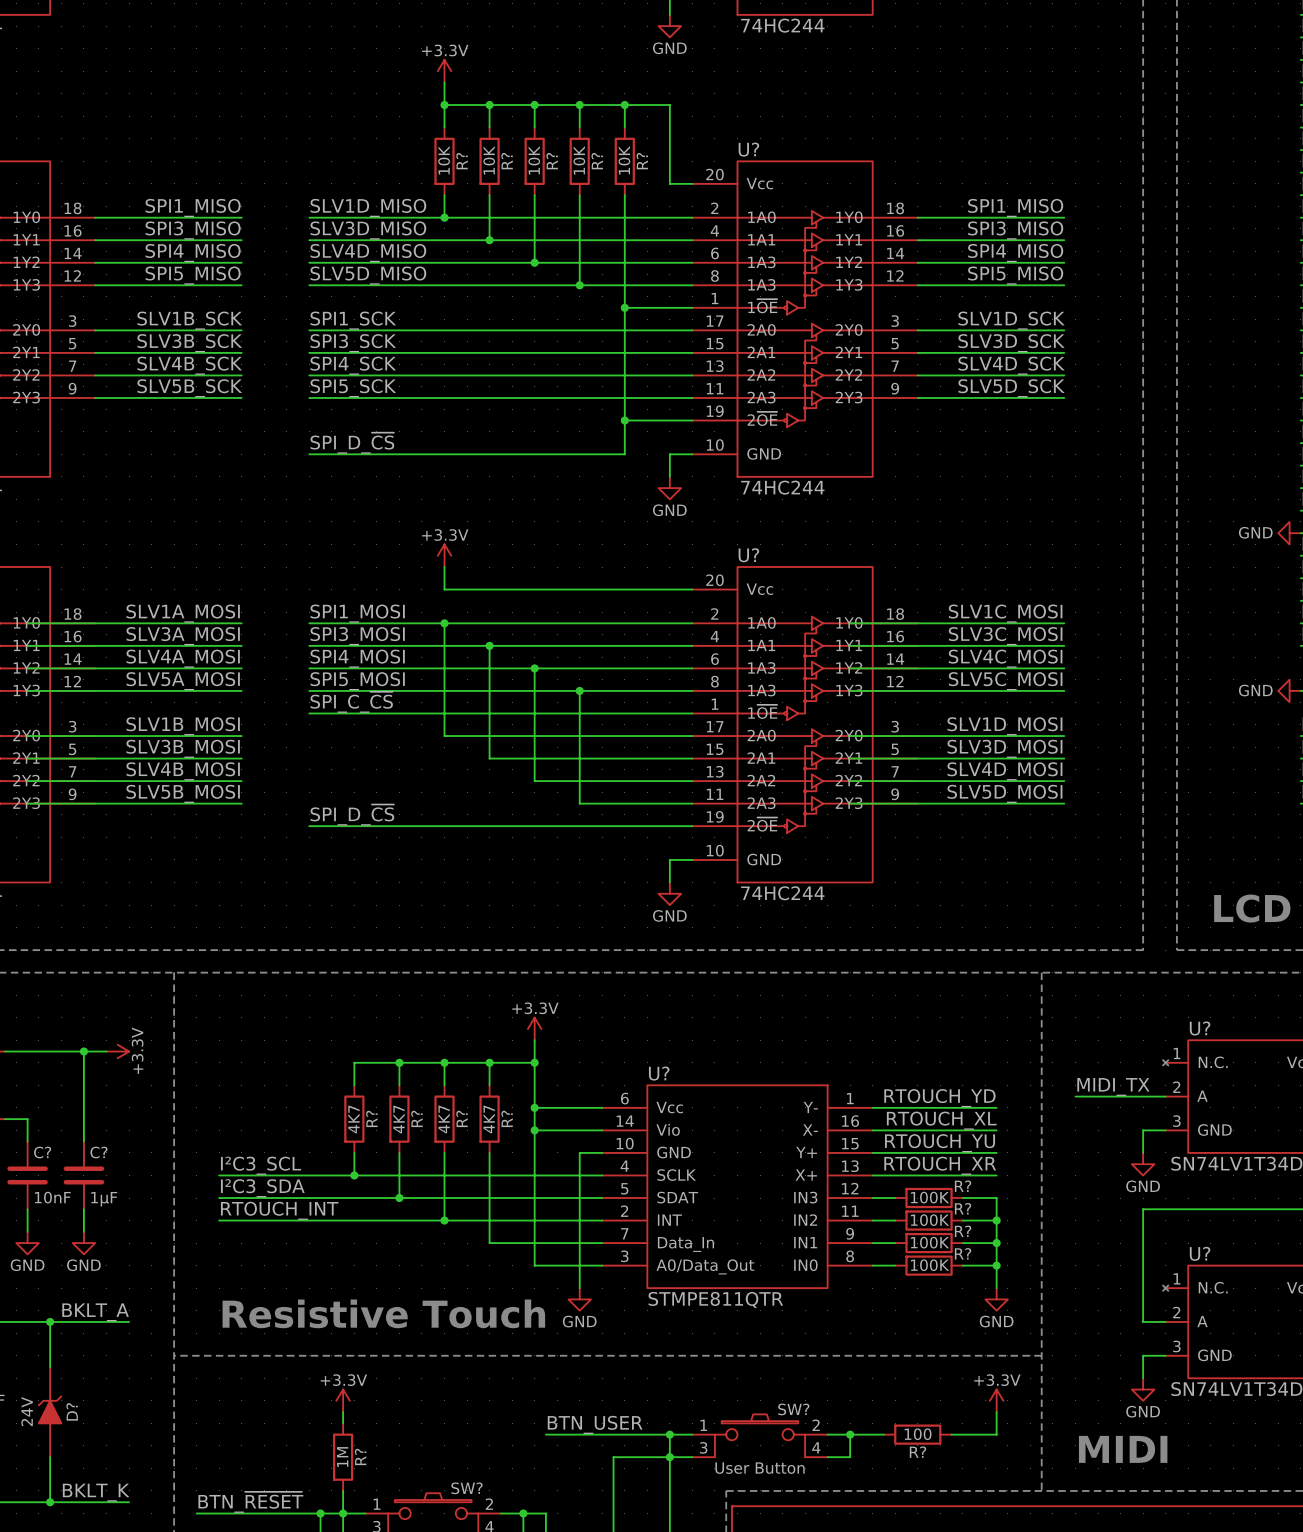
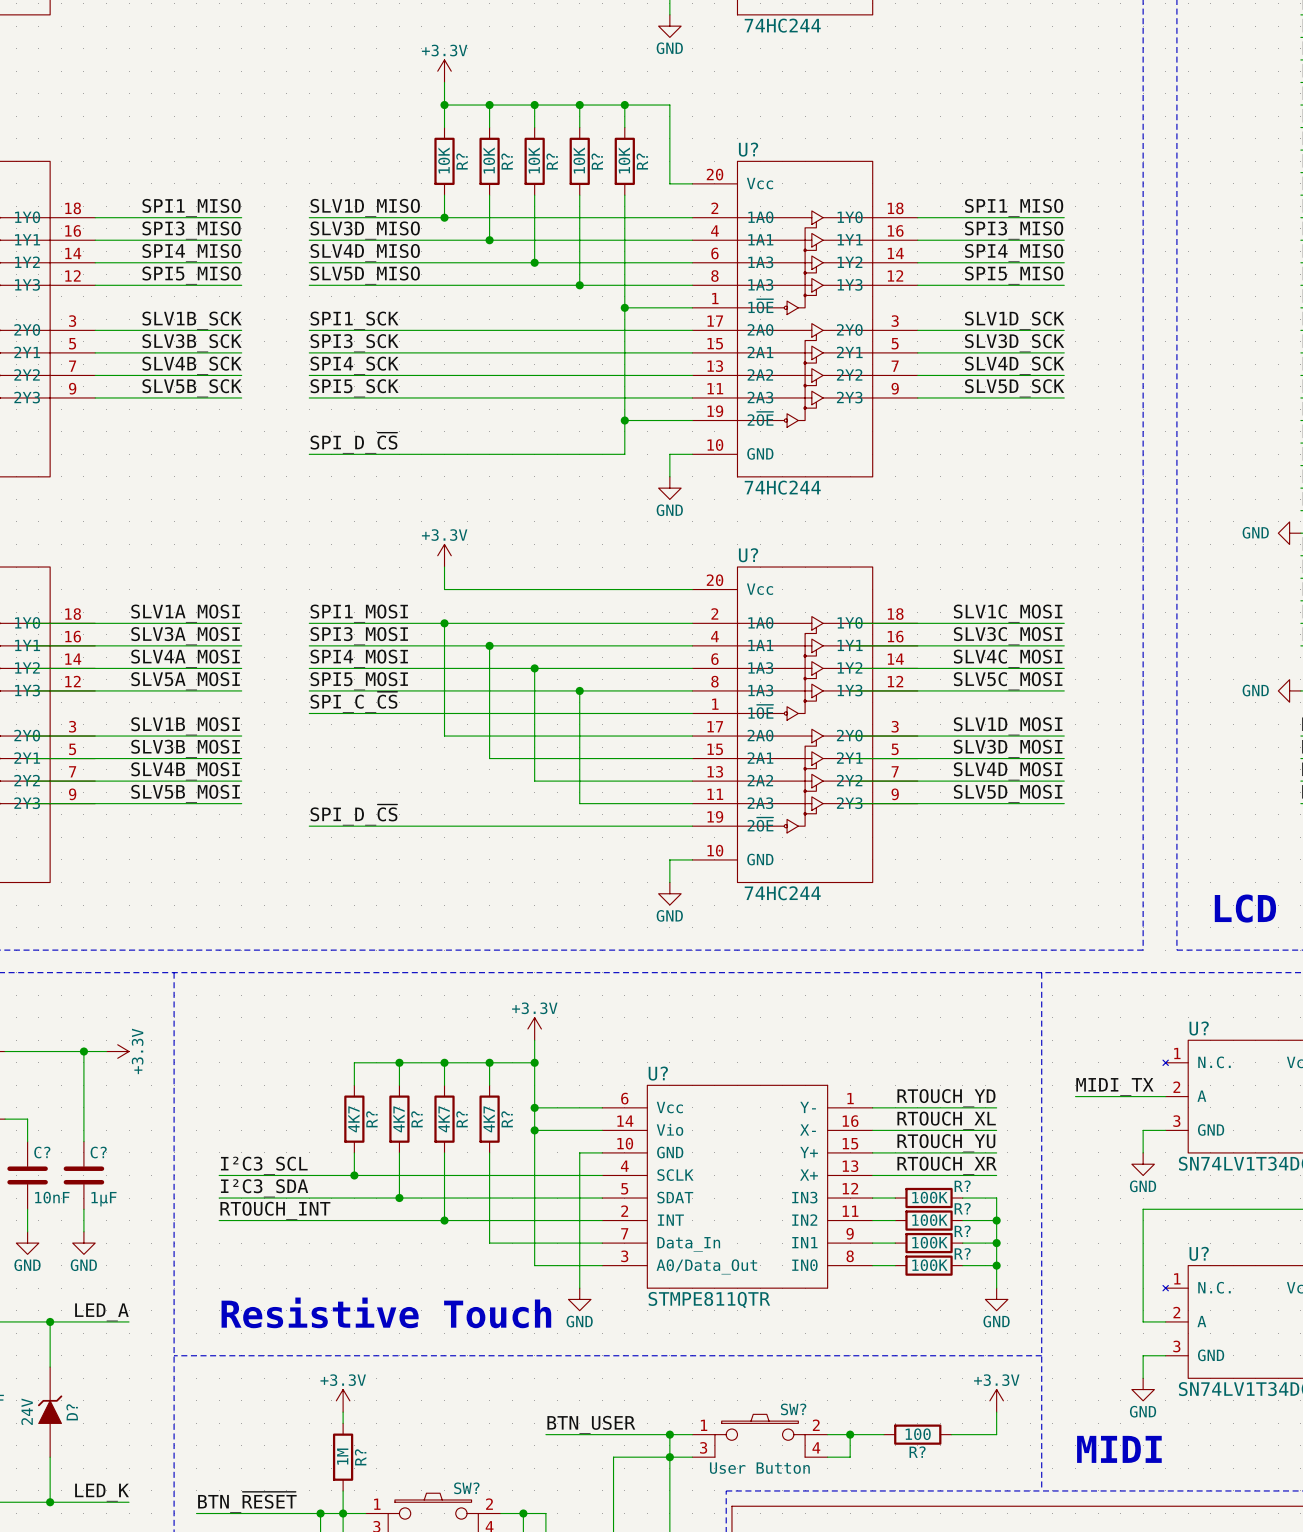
label: BKLT_A (95, 1312) -> LED_A (101, 1312)
label: BKLT_K (96, 1492) -> LED_K (102, 1492)

